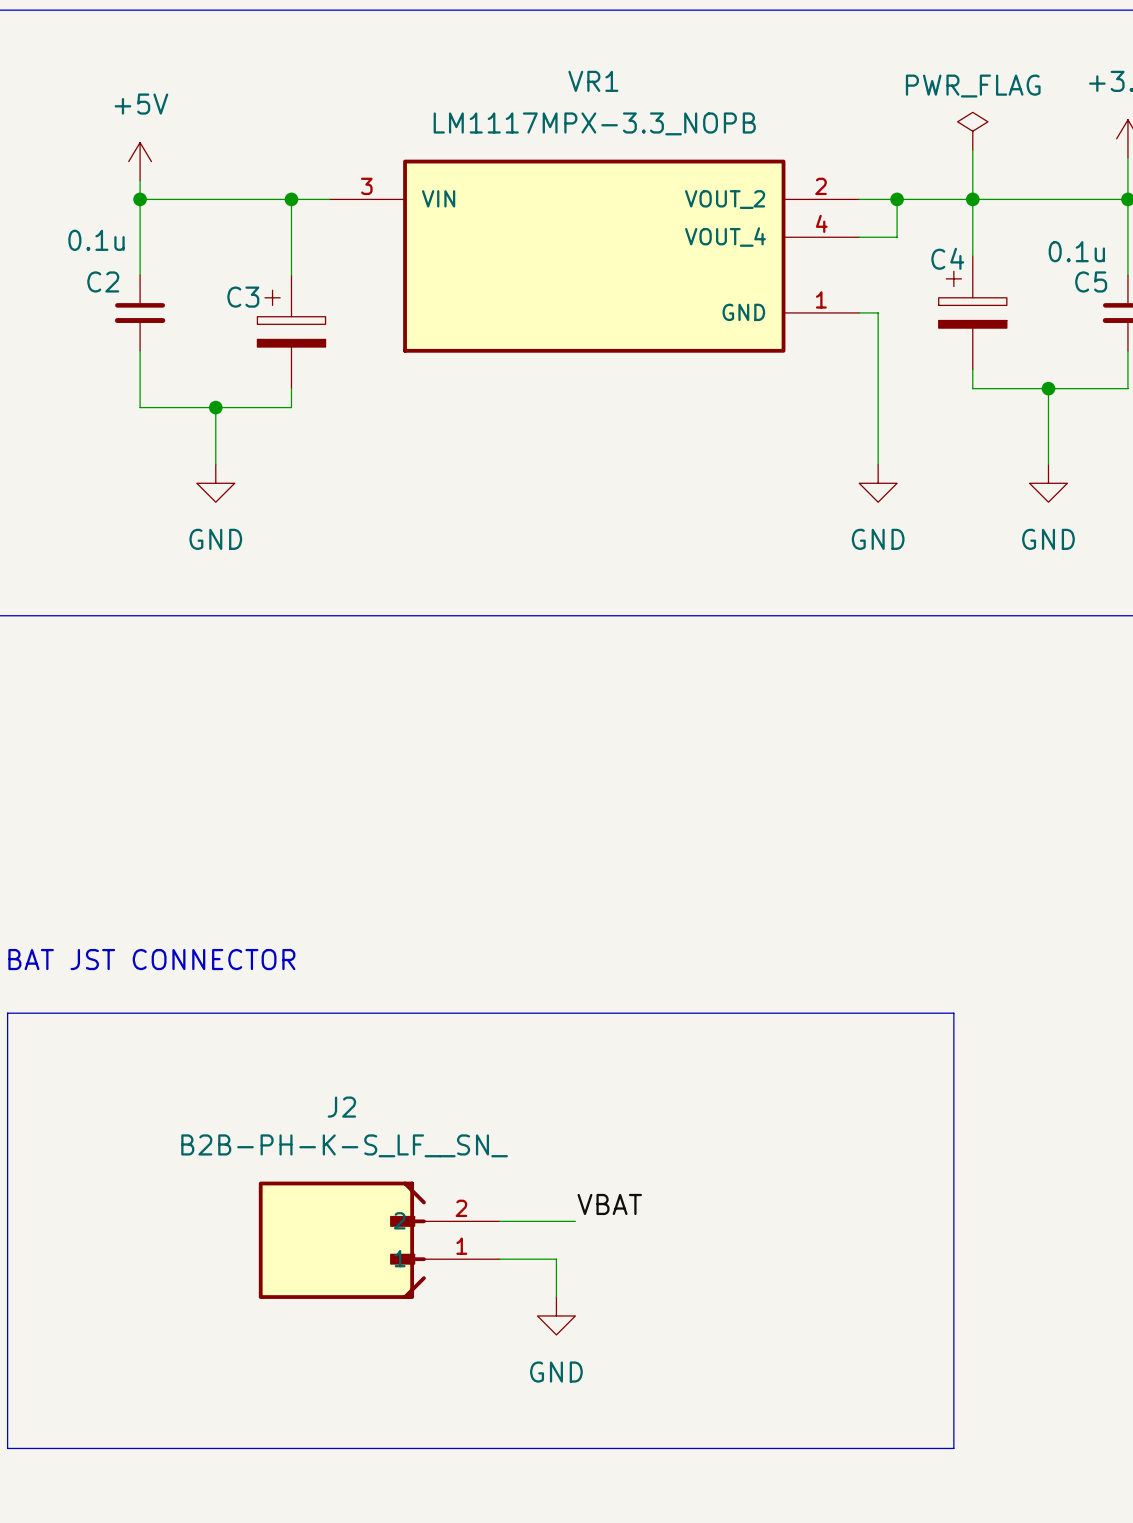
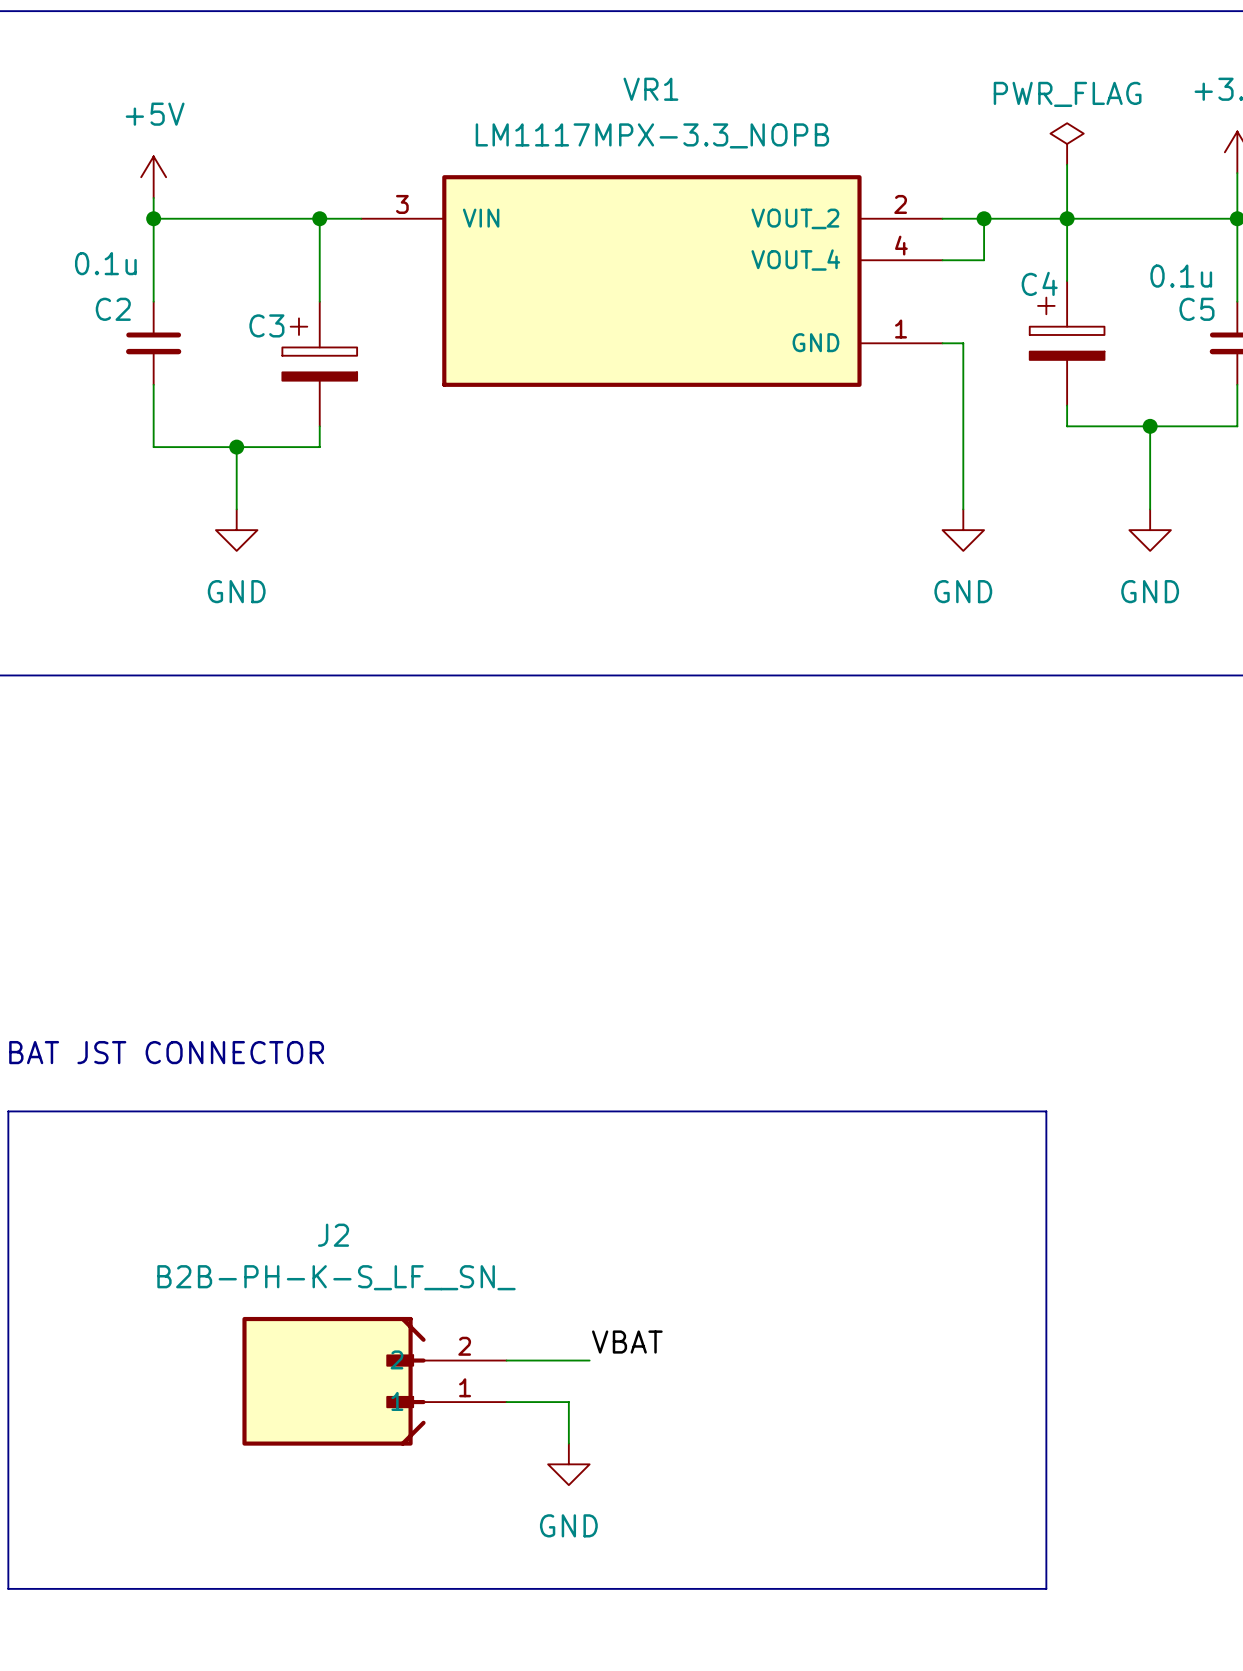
label position: VBAT (609, 1204) -> VBAT (627, 1342)
wire: (499, 1221) (575, 1221) -> (506, 1360) (589, 1360)
J2 position: (379, 1240) -> (374, 1381)
wire: (499, 1259) (556, 1259) (556, 1297) -> (506, 1402) (568, 1402) (568, 1443)
power symbol position: GND (556, 1315) -> GND (568, 1464)

